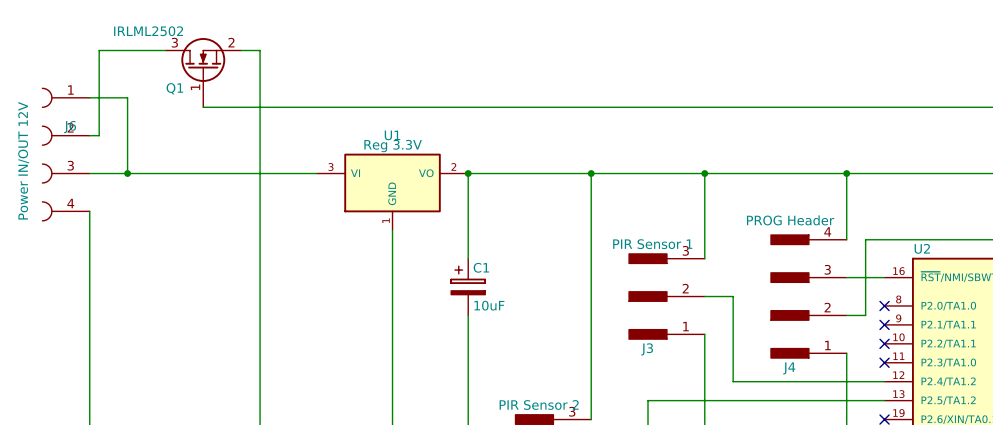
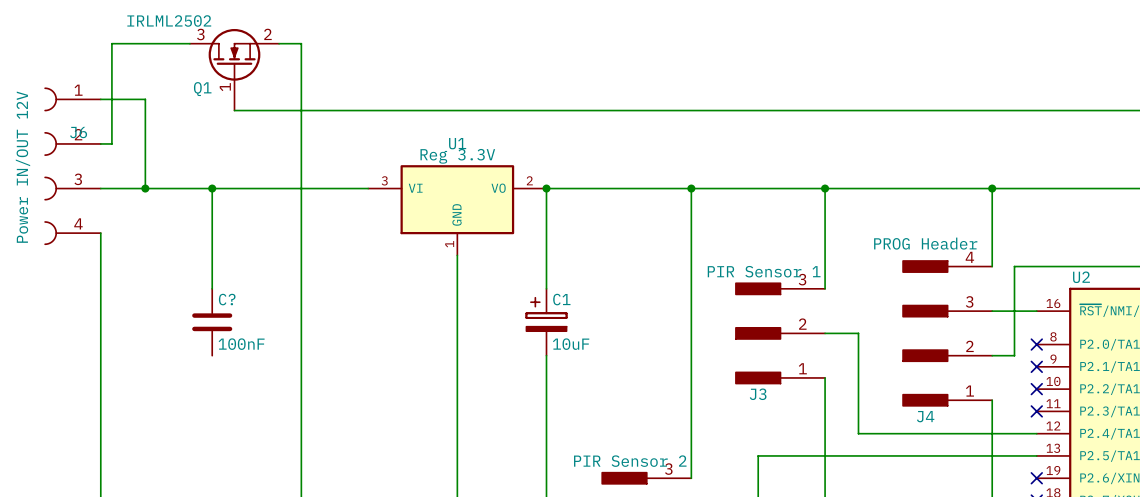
wire: none -> (212, 188) (212, 288)
junction: none -> (212, 188)
C?: none -> 100nF (212, 322)

